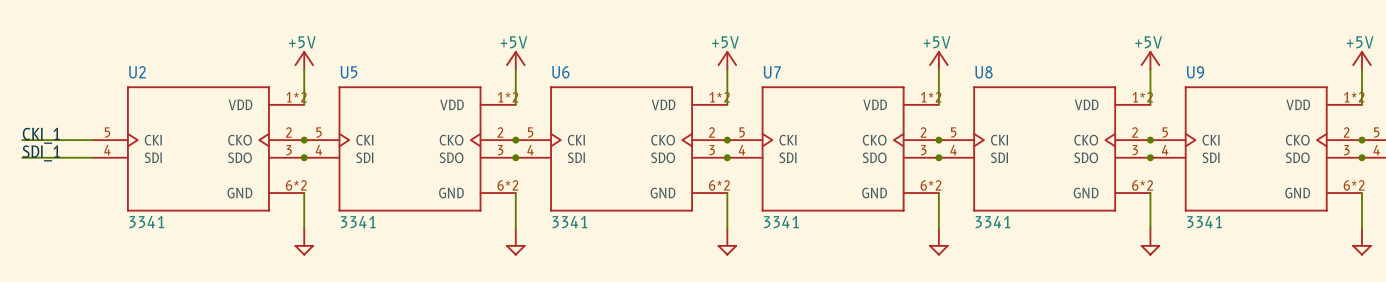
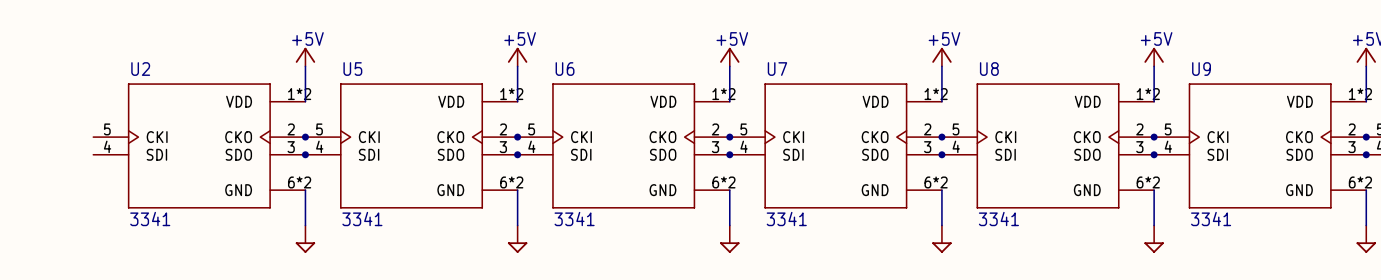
label: CKI_1 (41, 135) -> none
wire: (22, 140) (92, 140) -> none
label: SDI_1 (41, 153) -> none
wire: (22, 157) (92, 157) -> none

